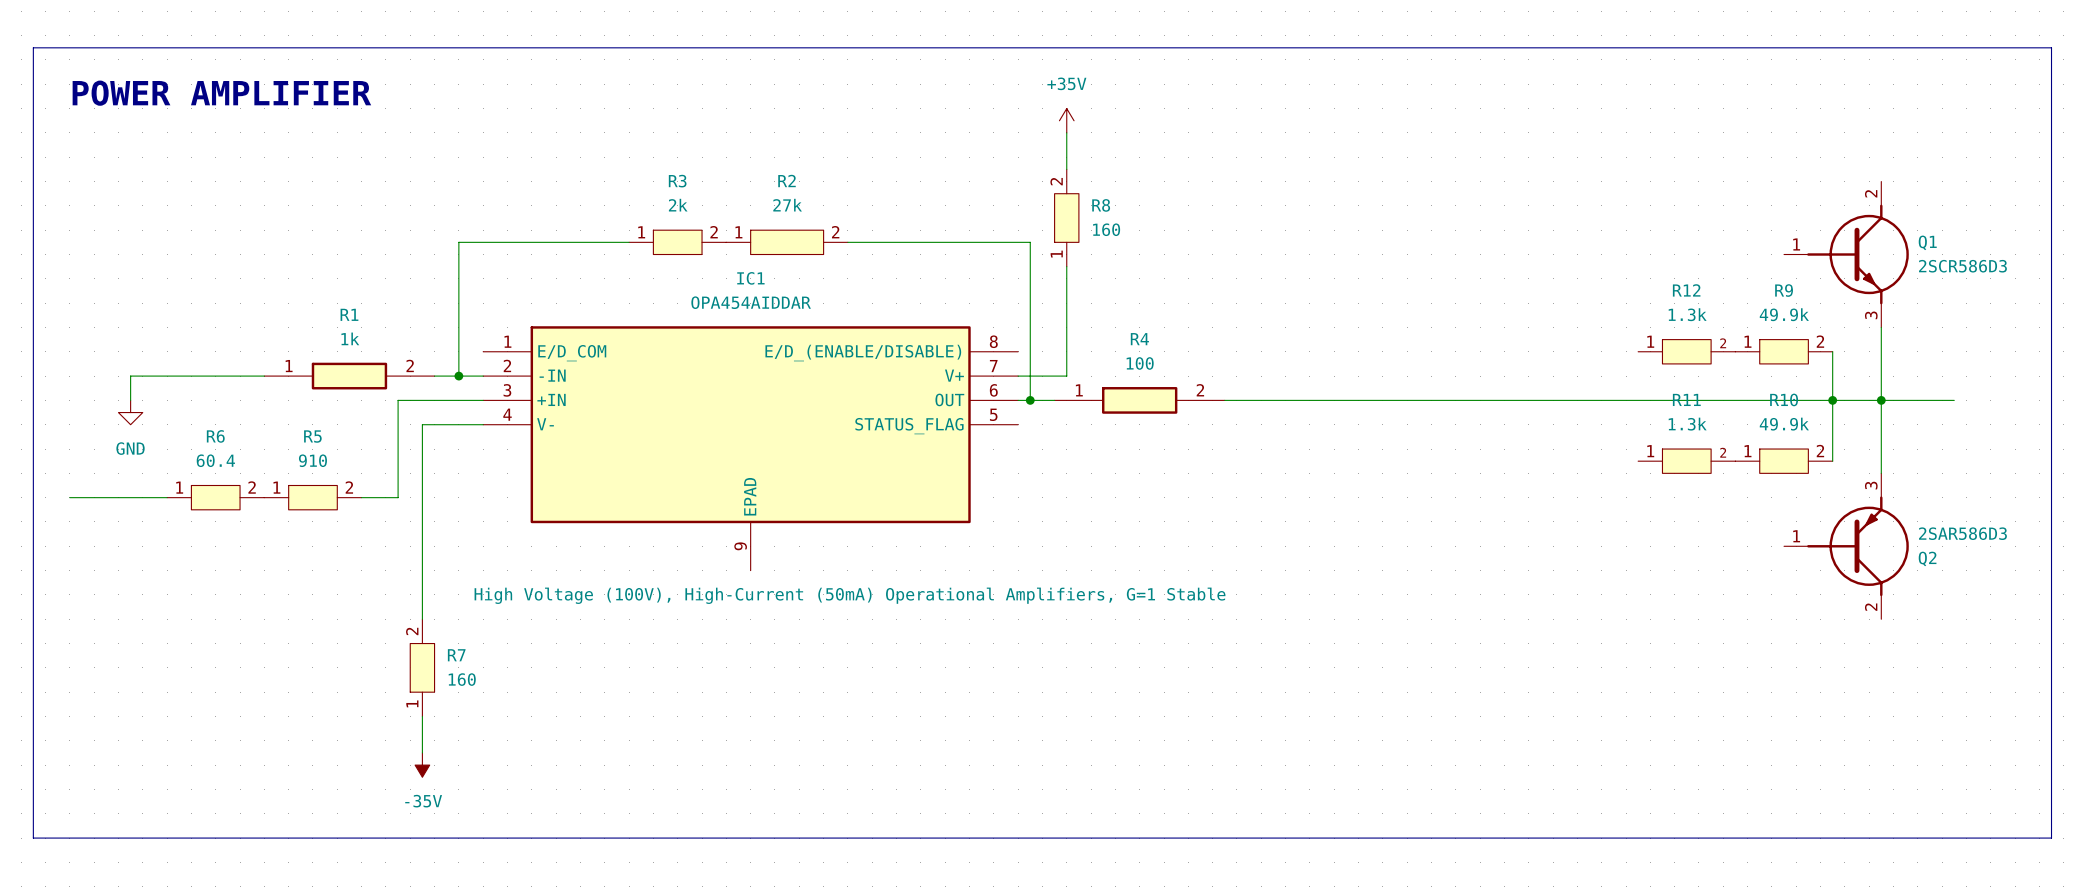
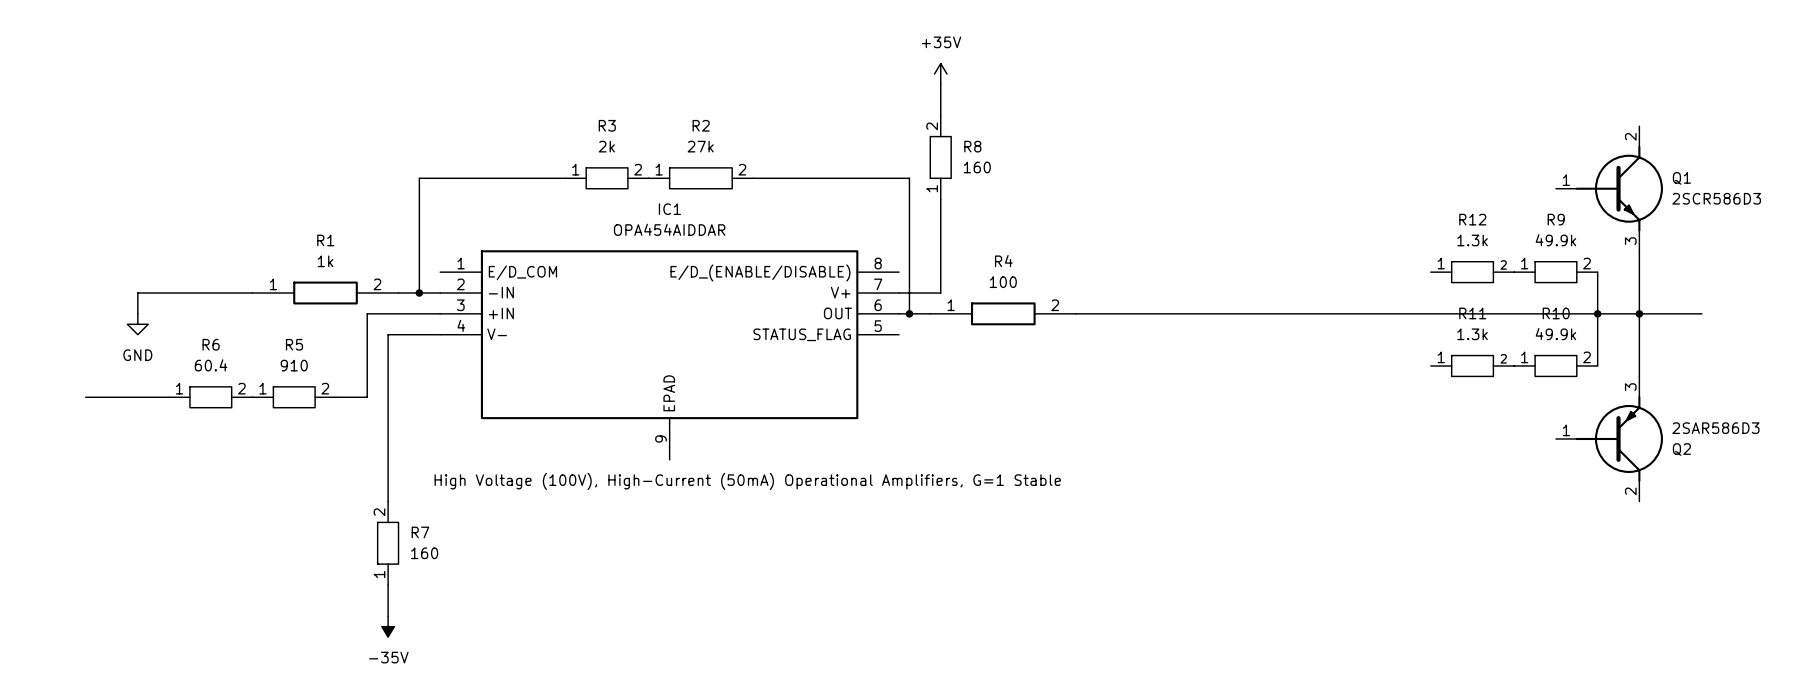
line: (33, 47) (2051, 47) (2051, 838) (33, 838) (33, 47) -> none
text: POWER AMPLIFIER (221, 93) -> none

